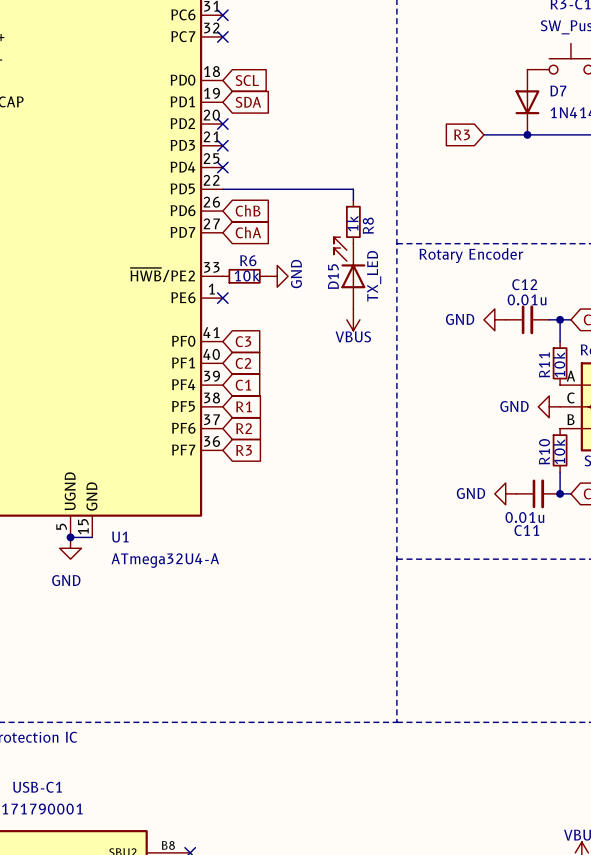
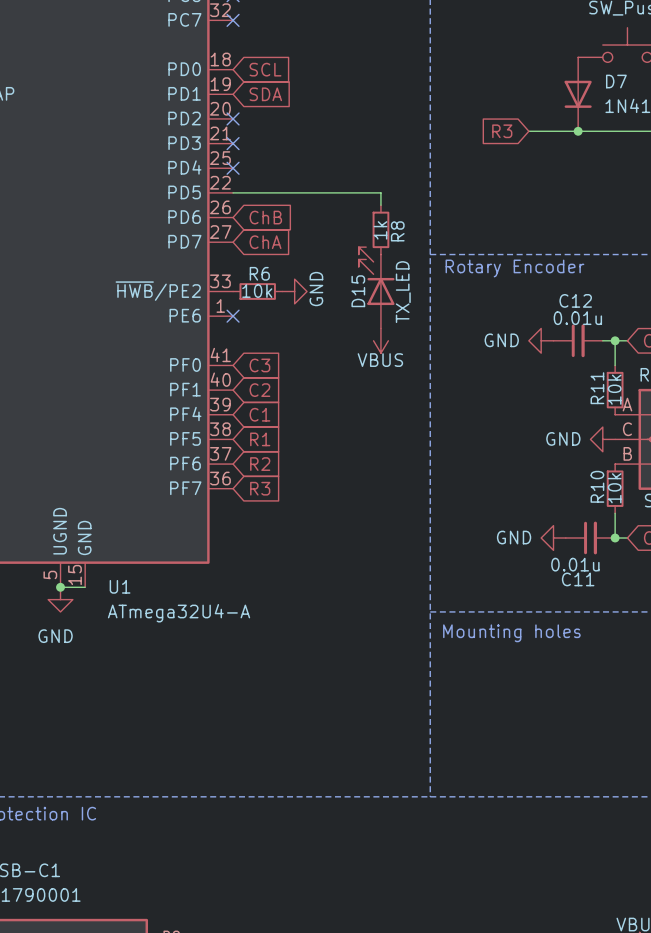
text: none -> Mounting holes (511, 633)

